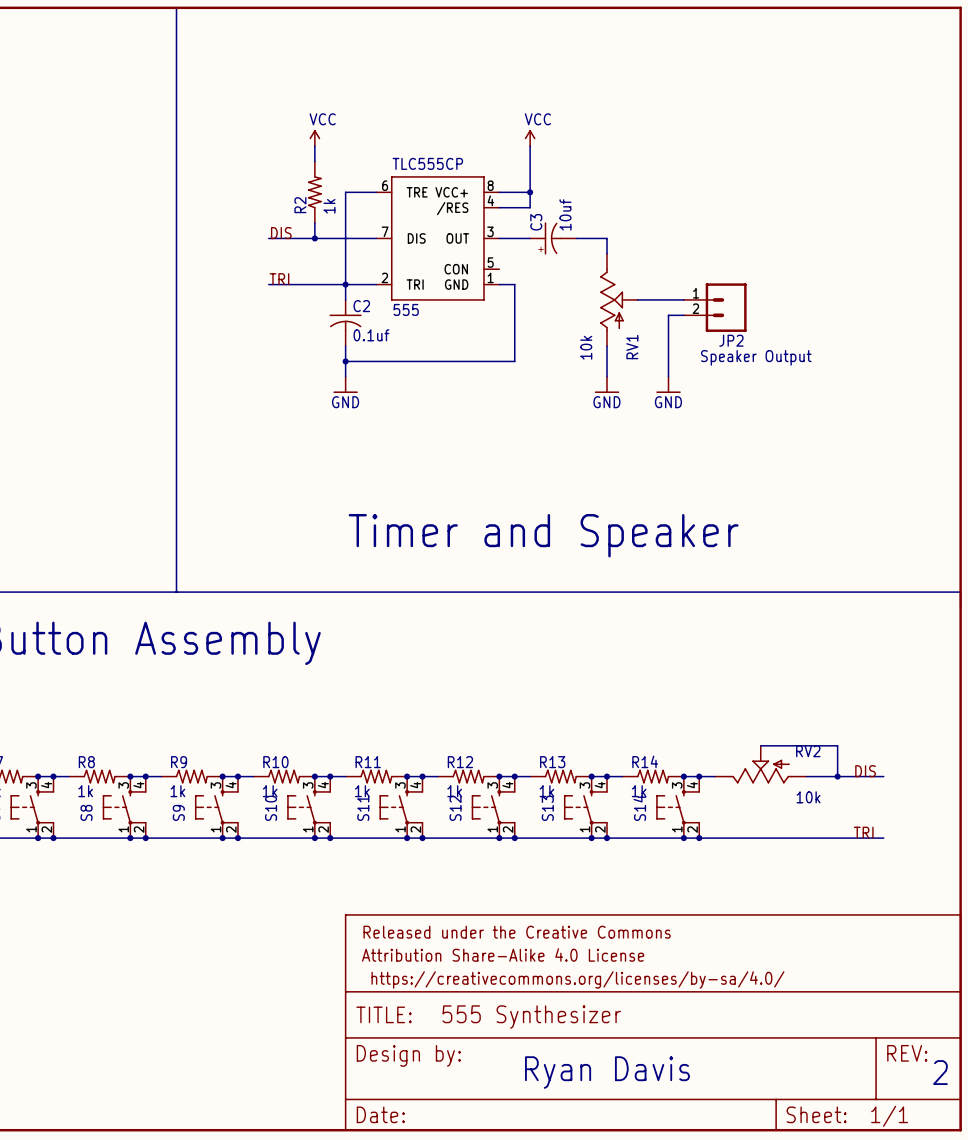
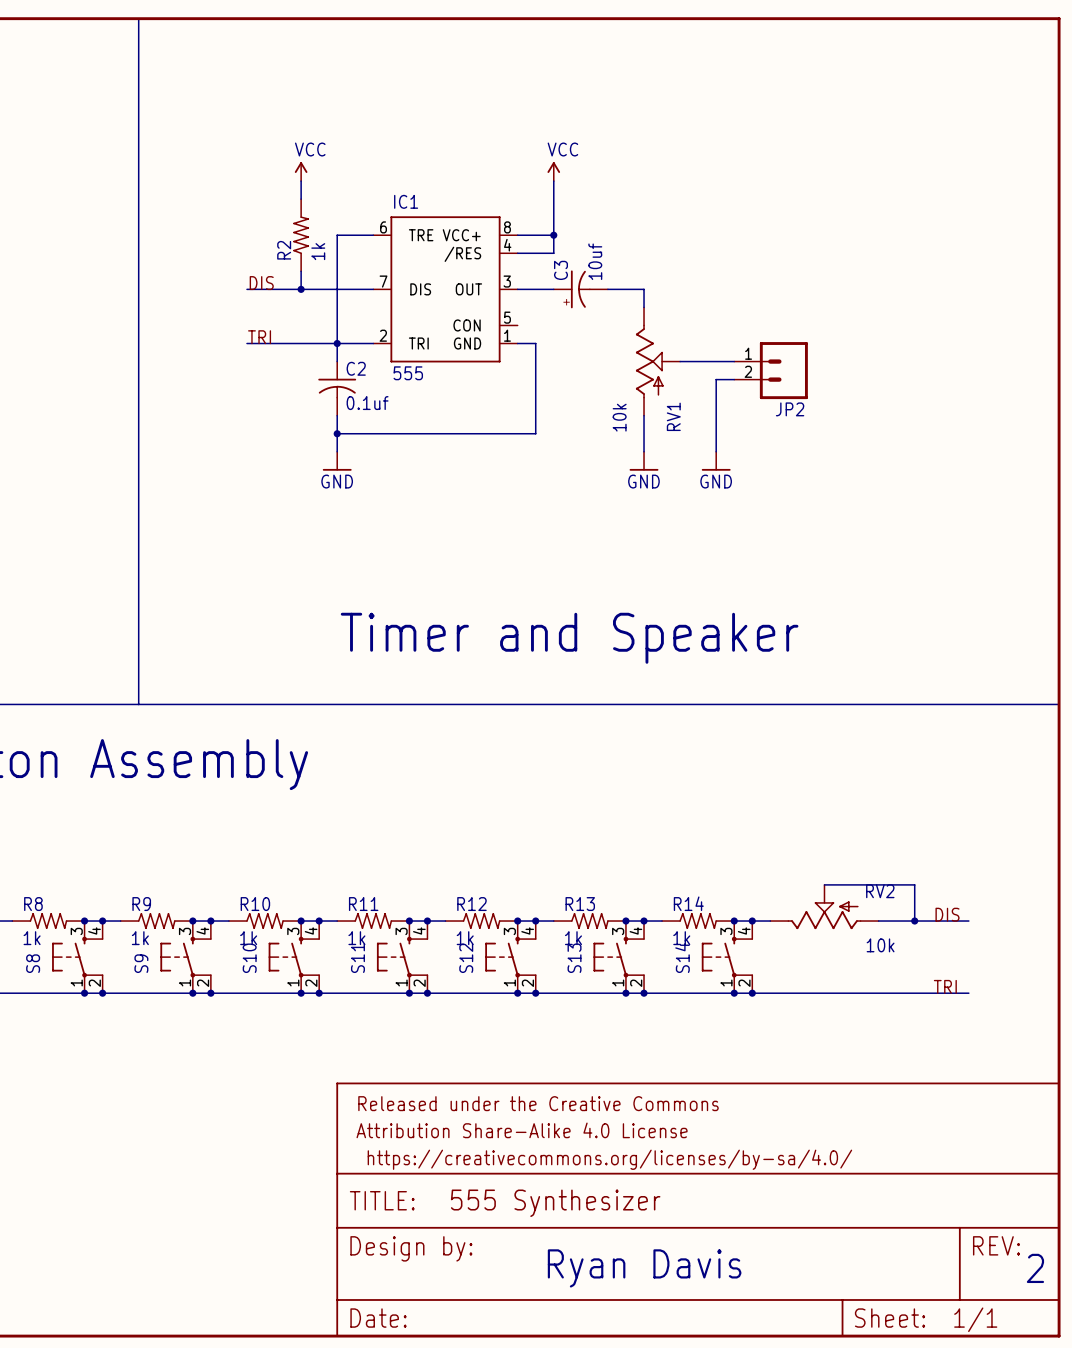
TLC555CP name: TLC555CP (427, 163) -> IC1 (406, 201)
text: Speaker Output (756, 357) -> none

